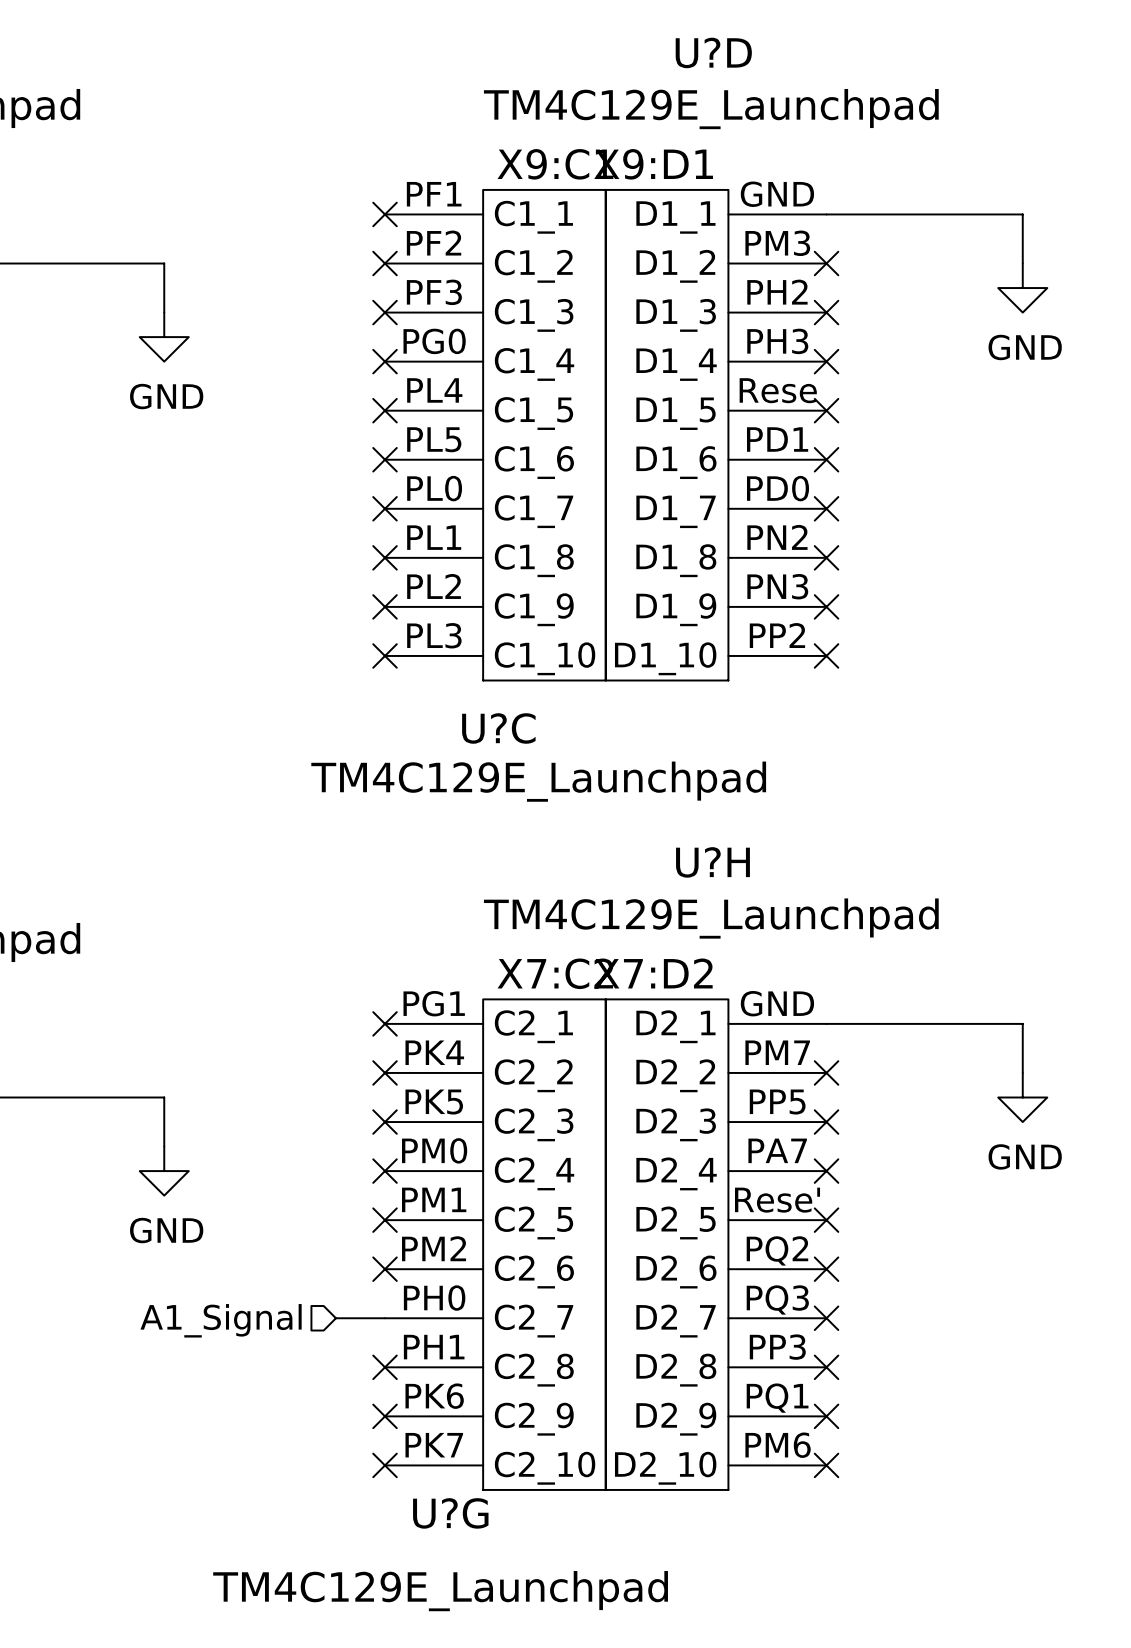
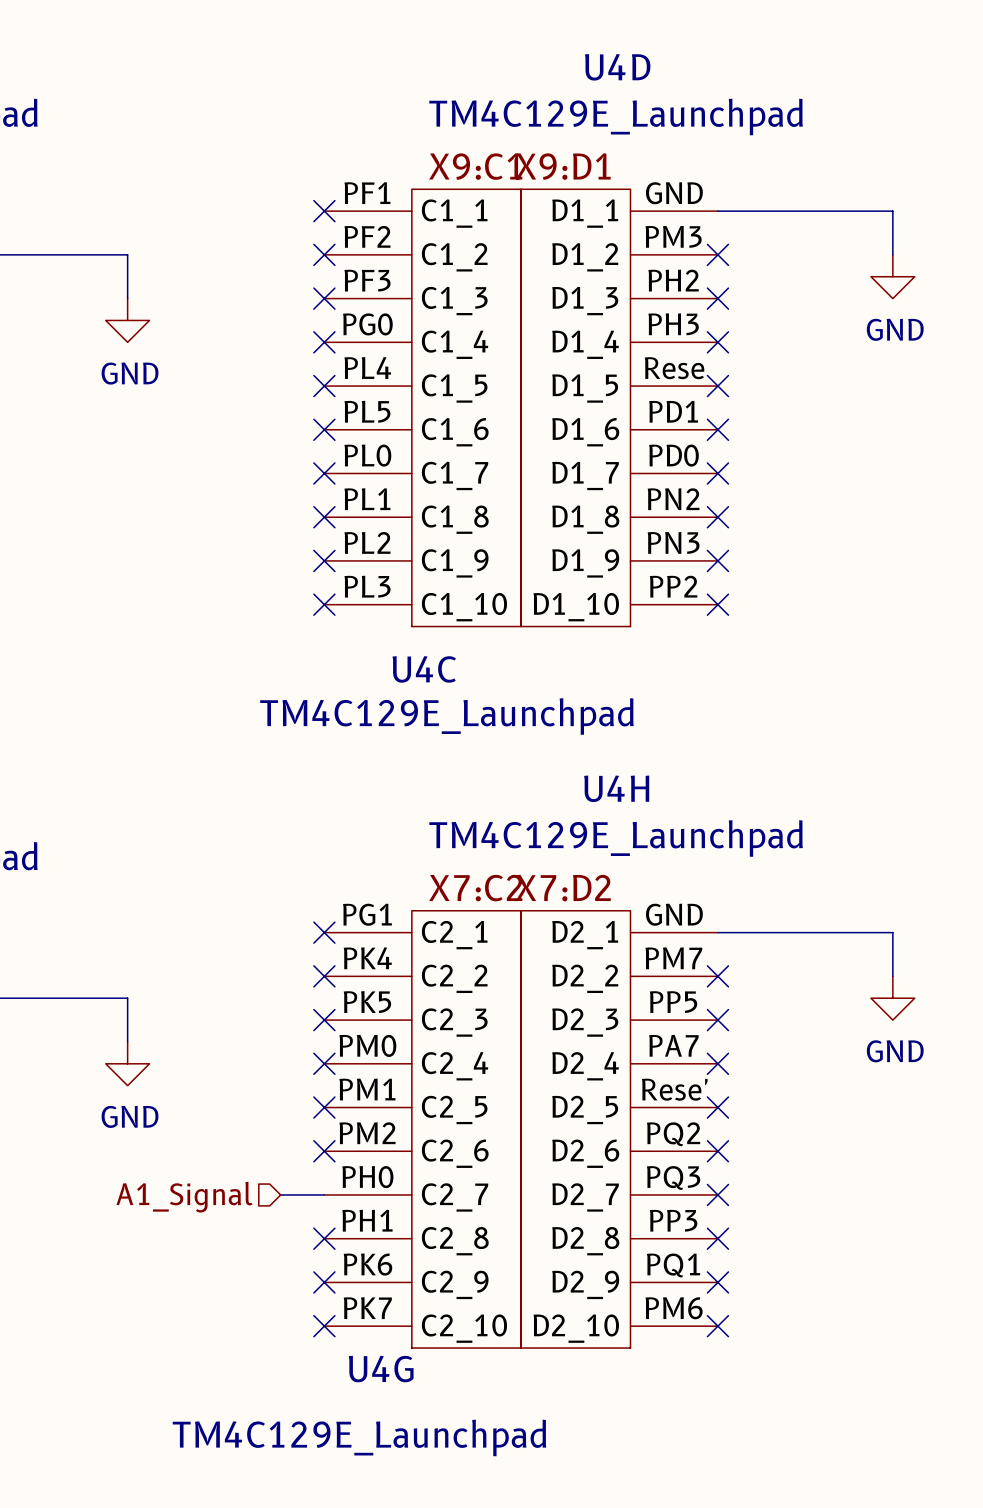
U?D name: U?D (713, 52) -> U4D (617, 67)
U?C name: U?C (498, 728) -> U4C (424, 669)
U?H name: U?H (712, 862) -> U4H (616, 788)
U?G name: U?G (450, 1513) -> U4G (381, 1369)

